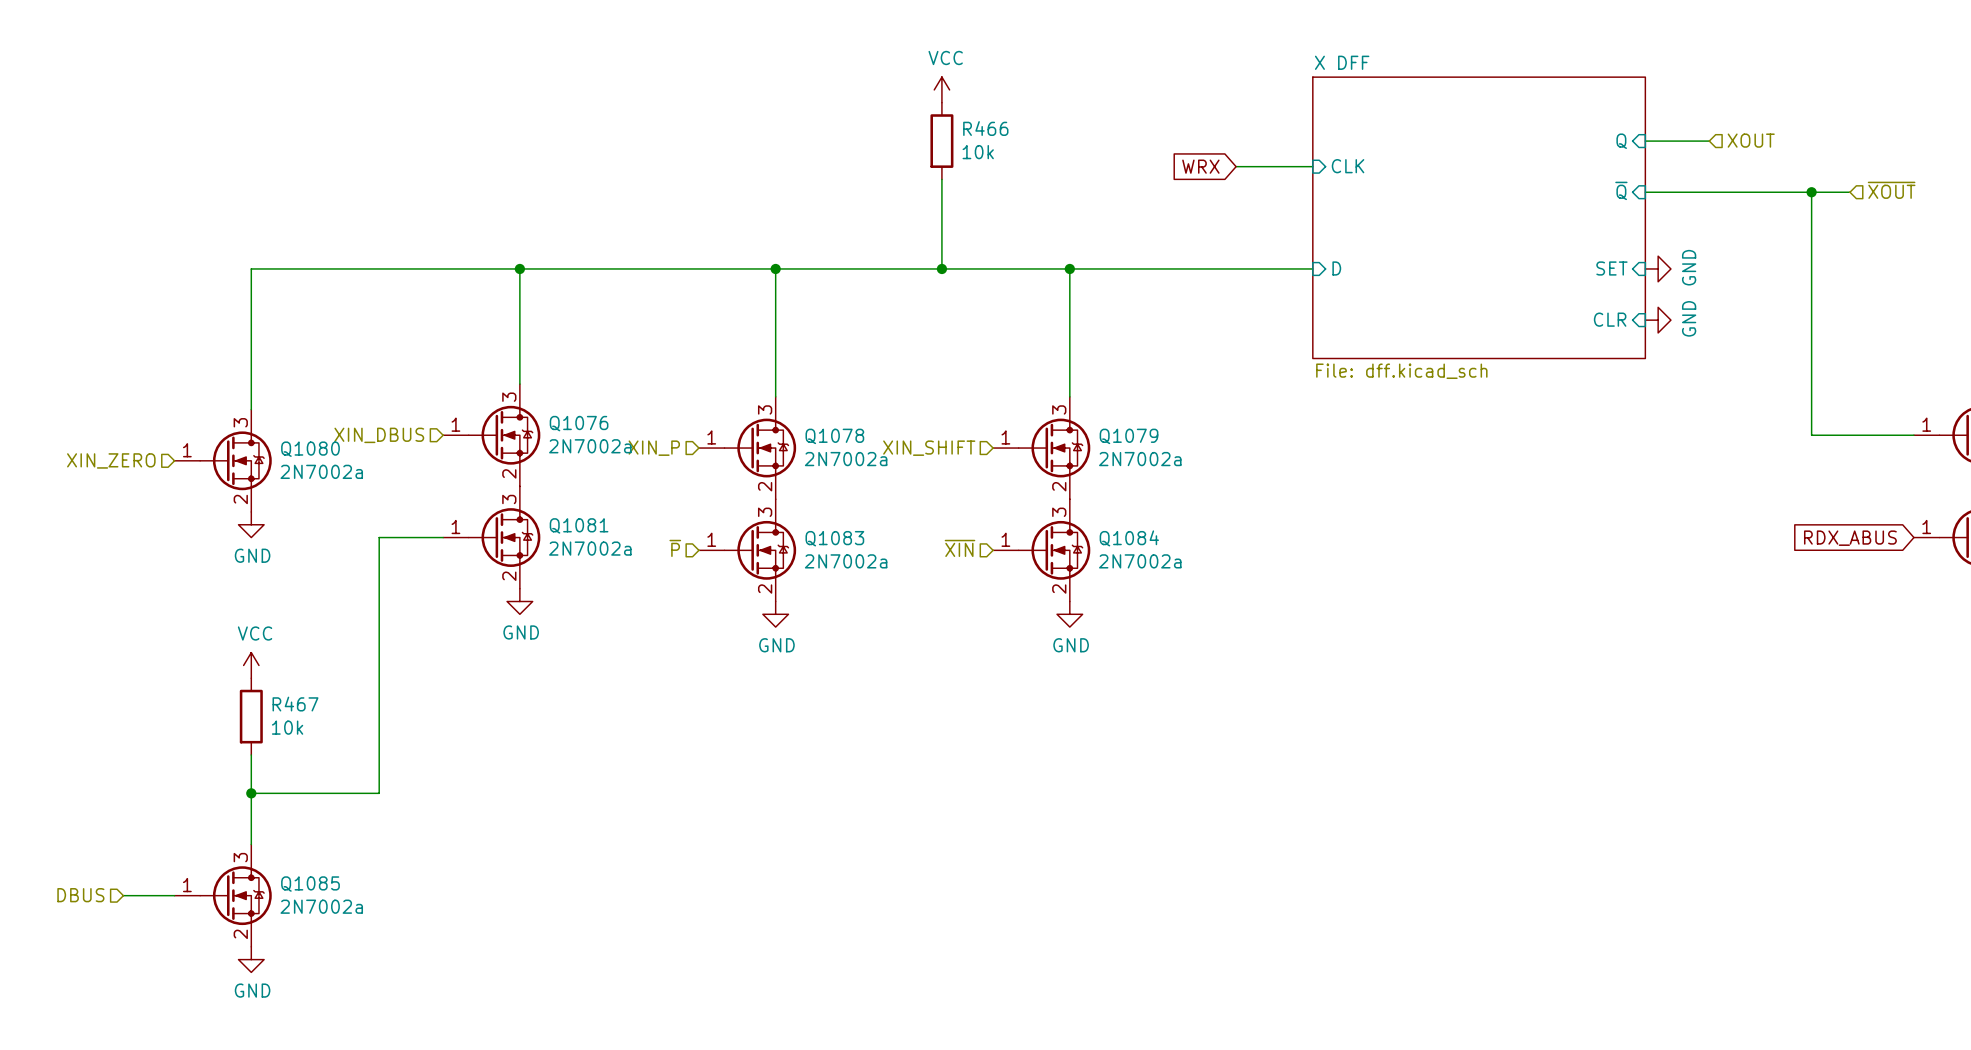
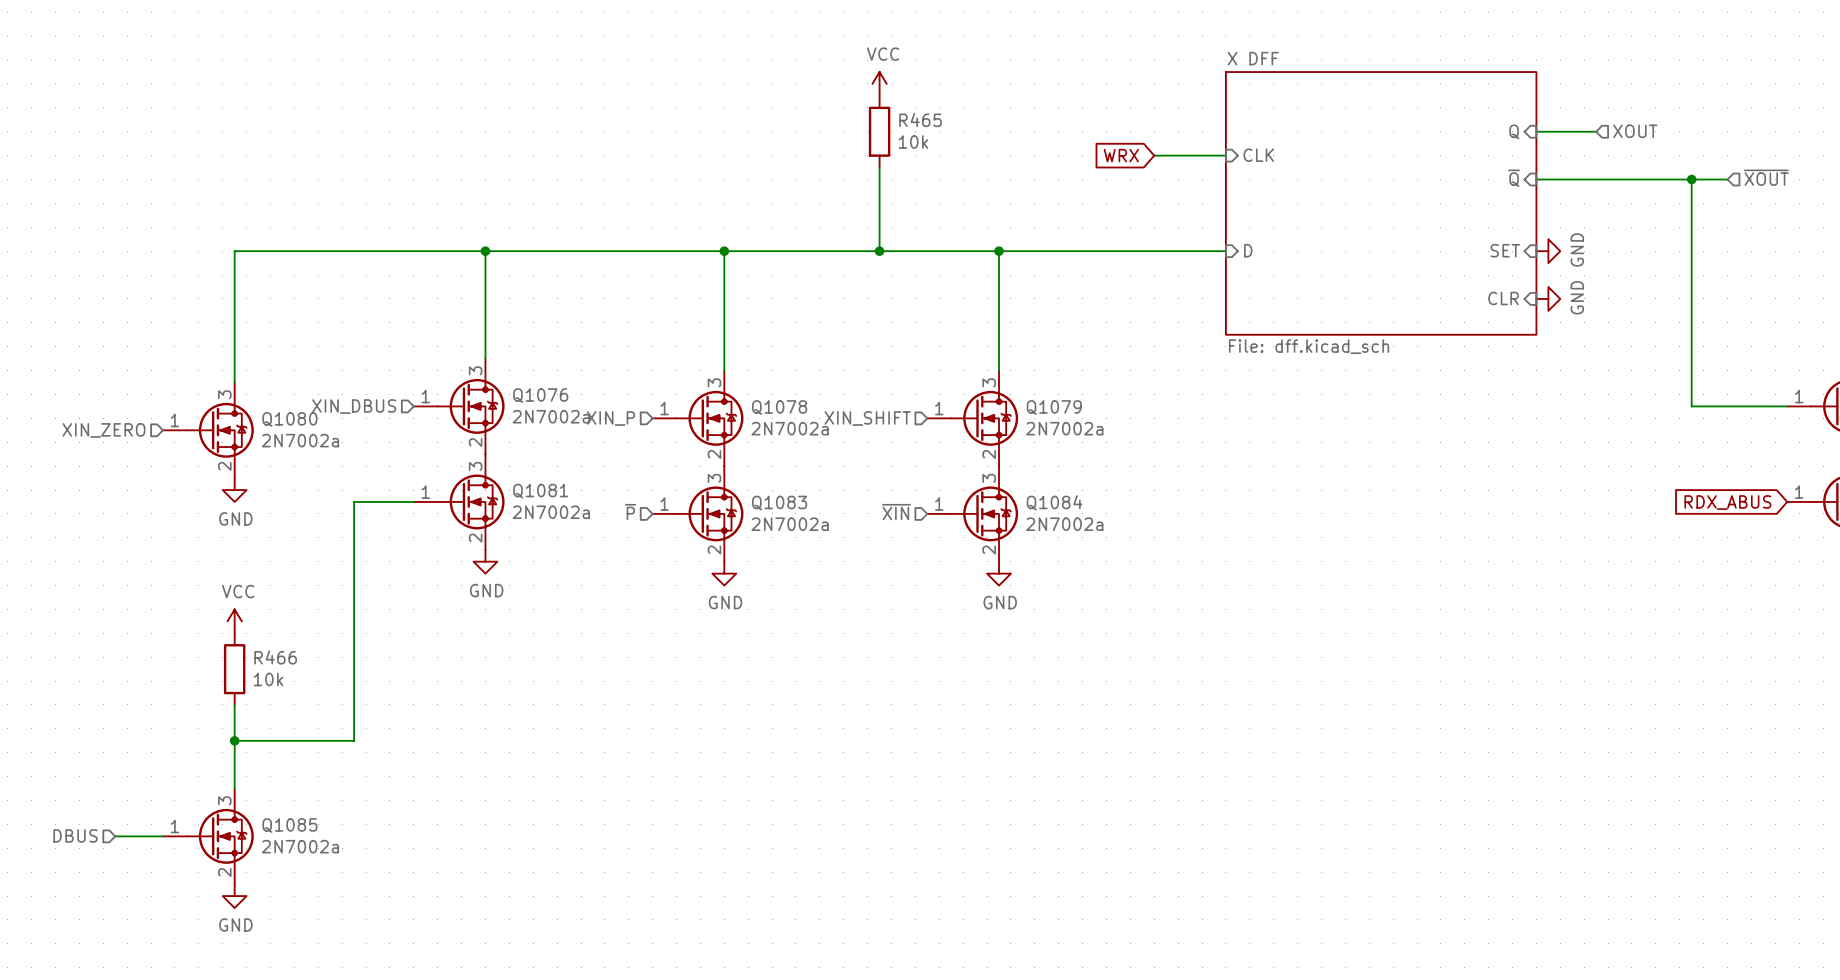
R466 name: R466 (985, 128) -> R465 (920, 120)
R467 name: R467 (295, 704) -> R466 (275, 657)

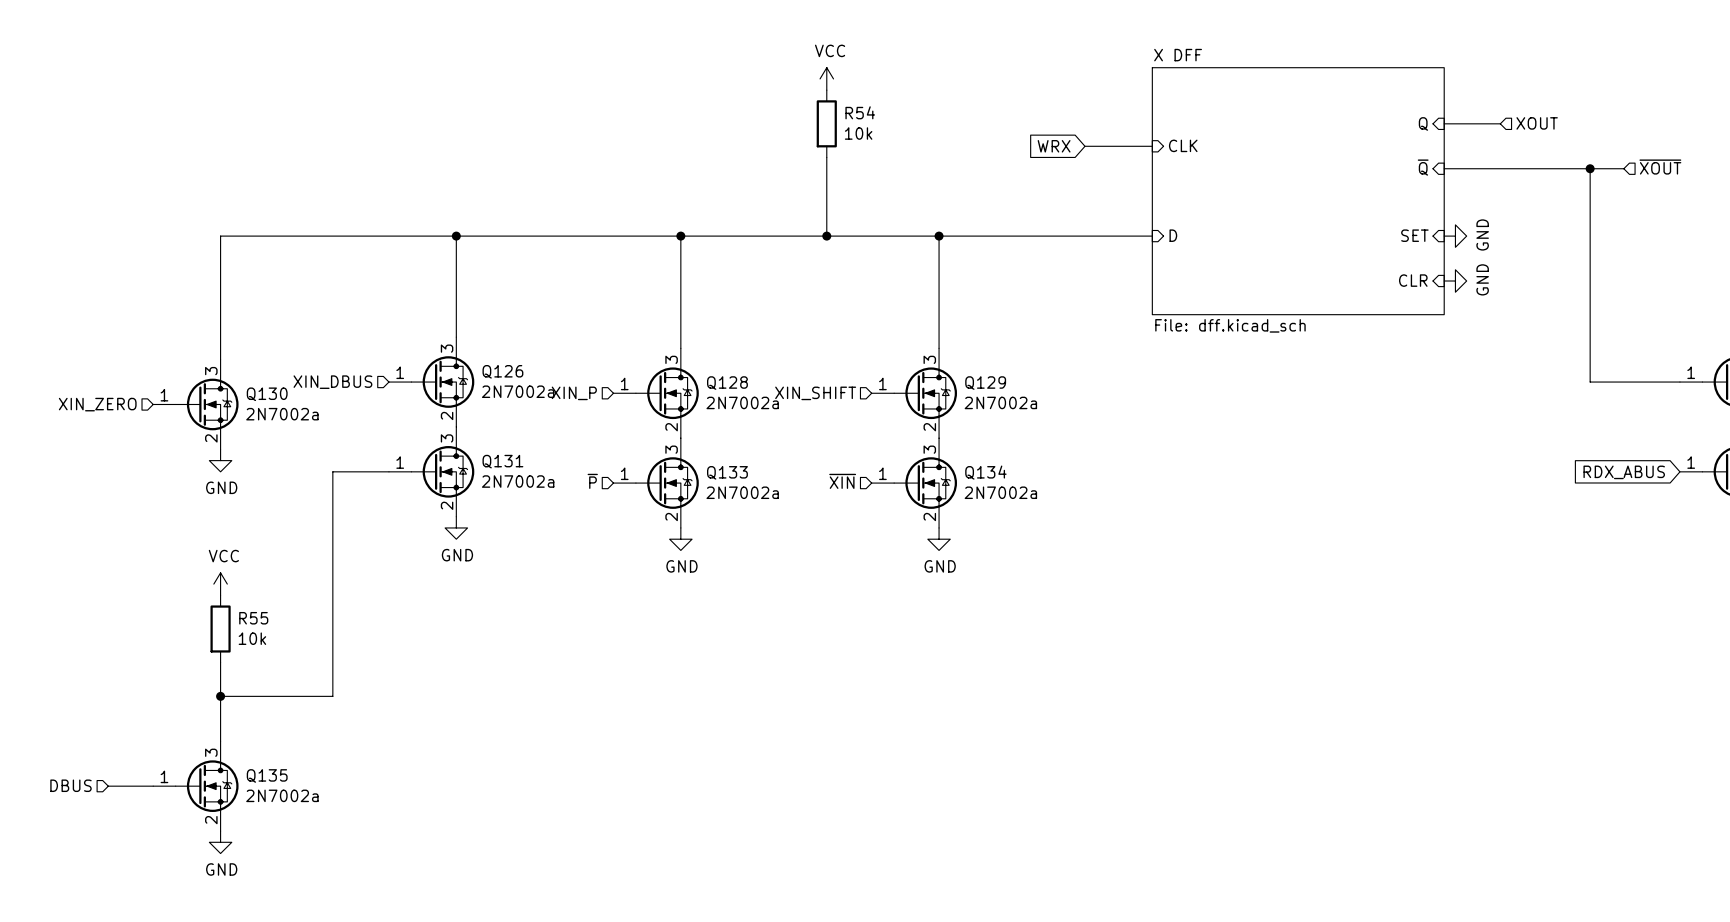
R465 name: R465 (920, 120) -> R54 (860, 112)
Q1076 name: Q1076 (540, 395) -> Q126 (502, 371)
Q1078 name: Q1078 (779, 407) -> Q128 (727, 383)
Q1079 name: Q1079 (1054, 407) -> Q129 (985, 383)
Q1080 name: Q1080 (289, 419) -> Q130 (267, 394)
Q1081 name: Q1081 (540, 491) -> Q131 (502, 461)
Q1084 name: Q1084 (1054, 502) -> Q134 (985, 472)
Q1083 name: Q1083 (779, 503) -> Q133 (727, 472)
R466 name: R466 (275, 657) -> R55 (253, 618)
Q1085 name: Q1085 (289, 825) -> Q135 (267, 775)

